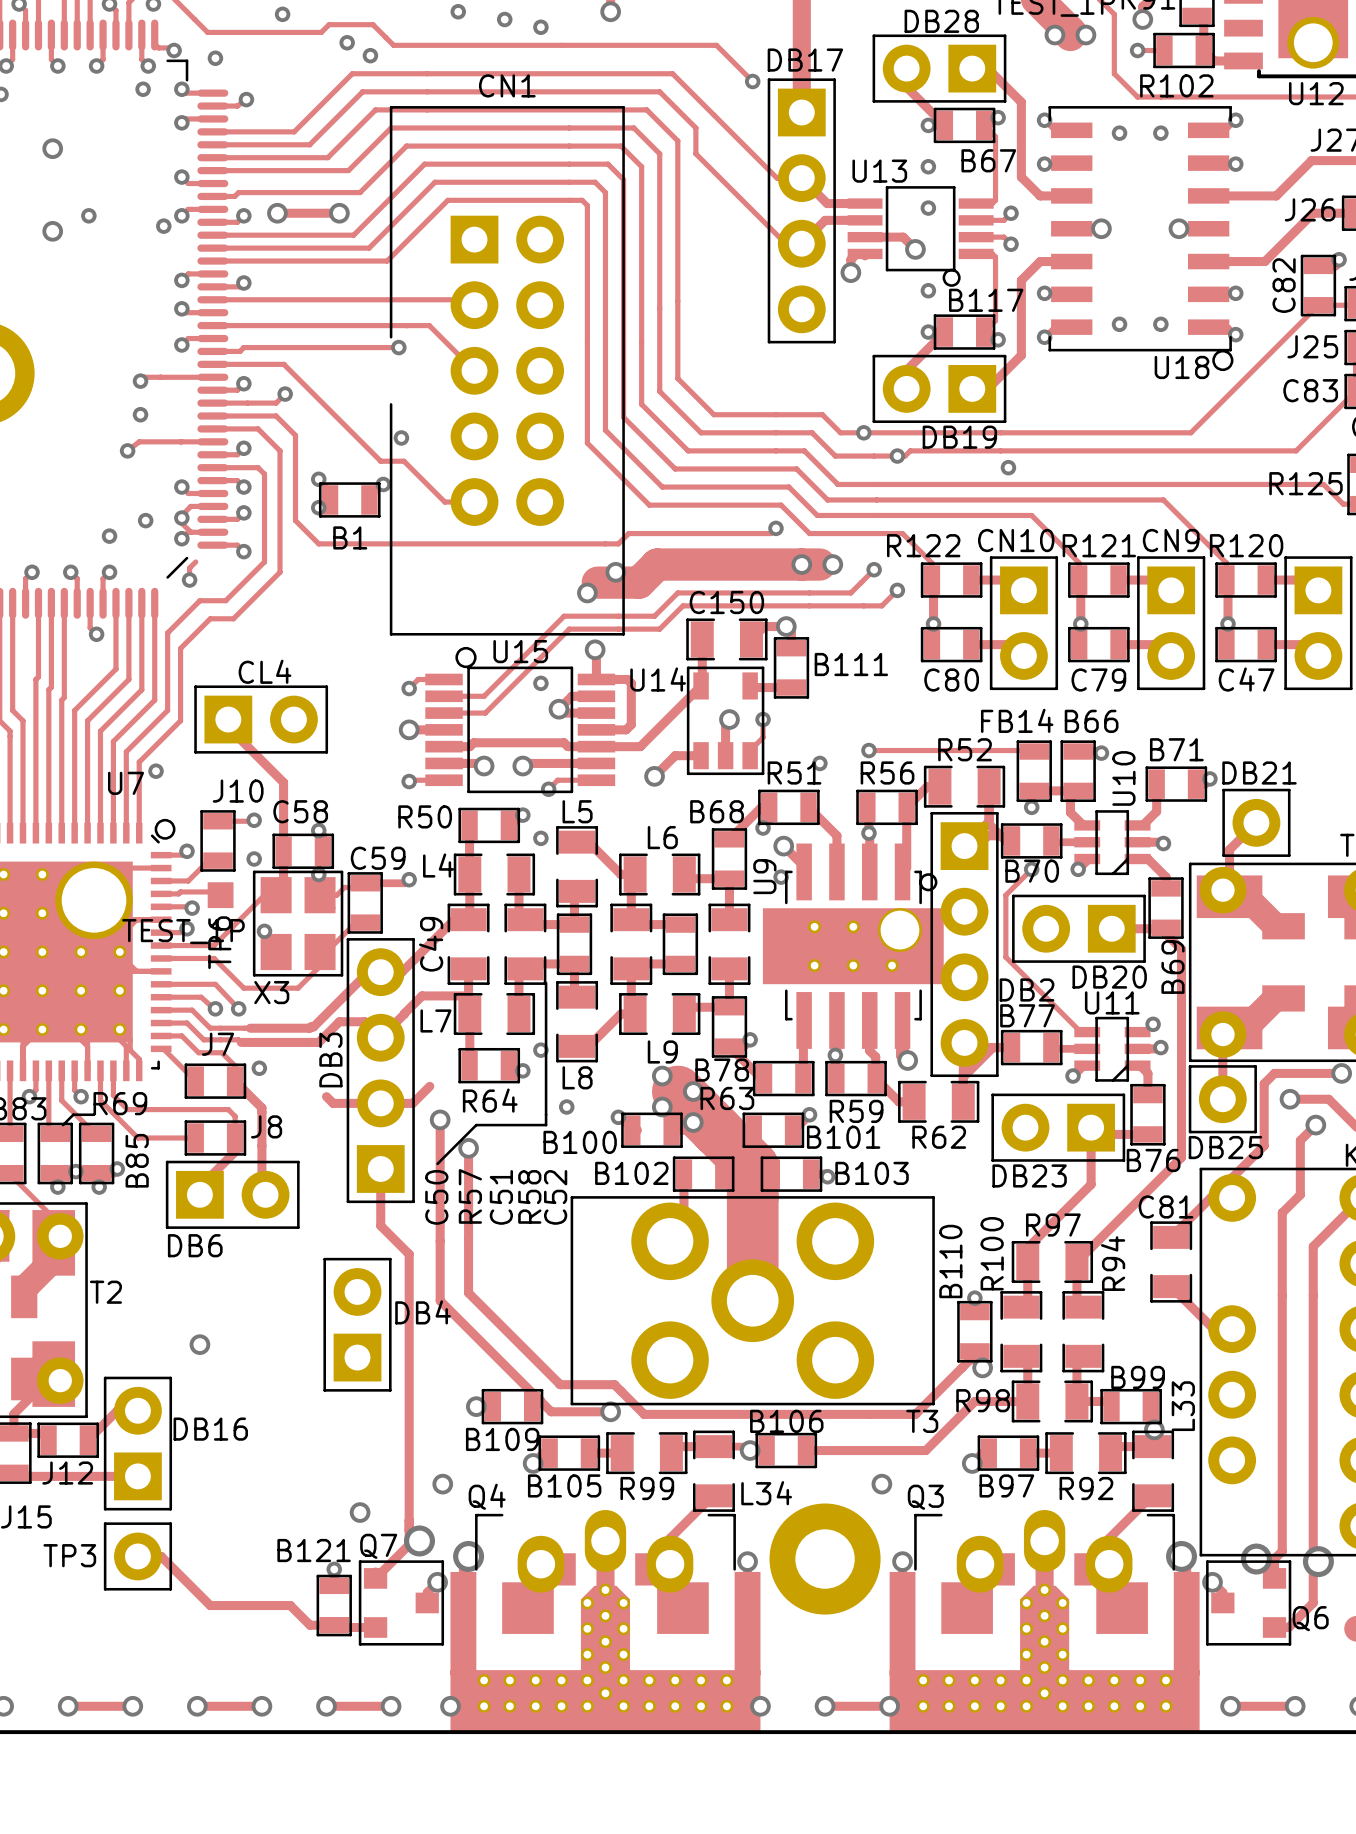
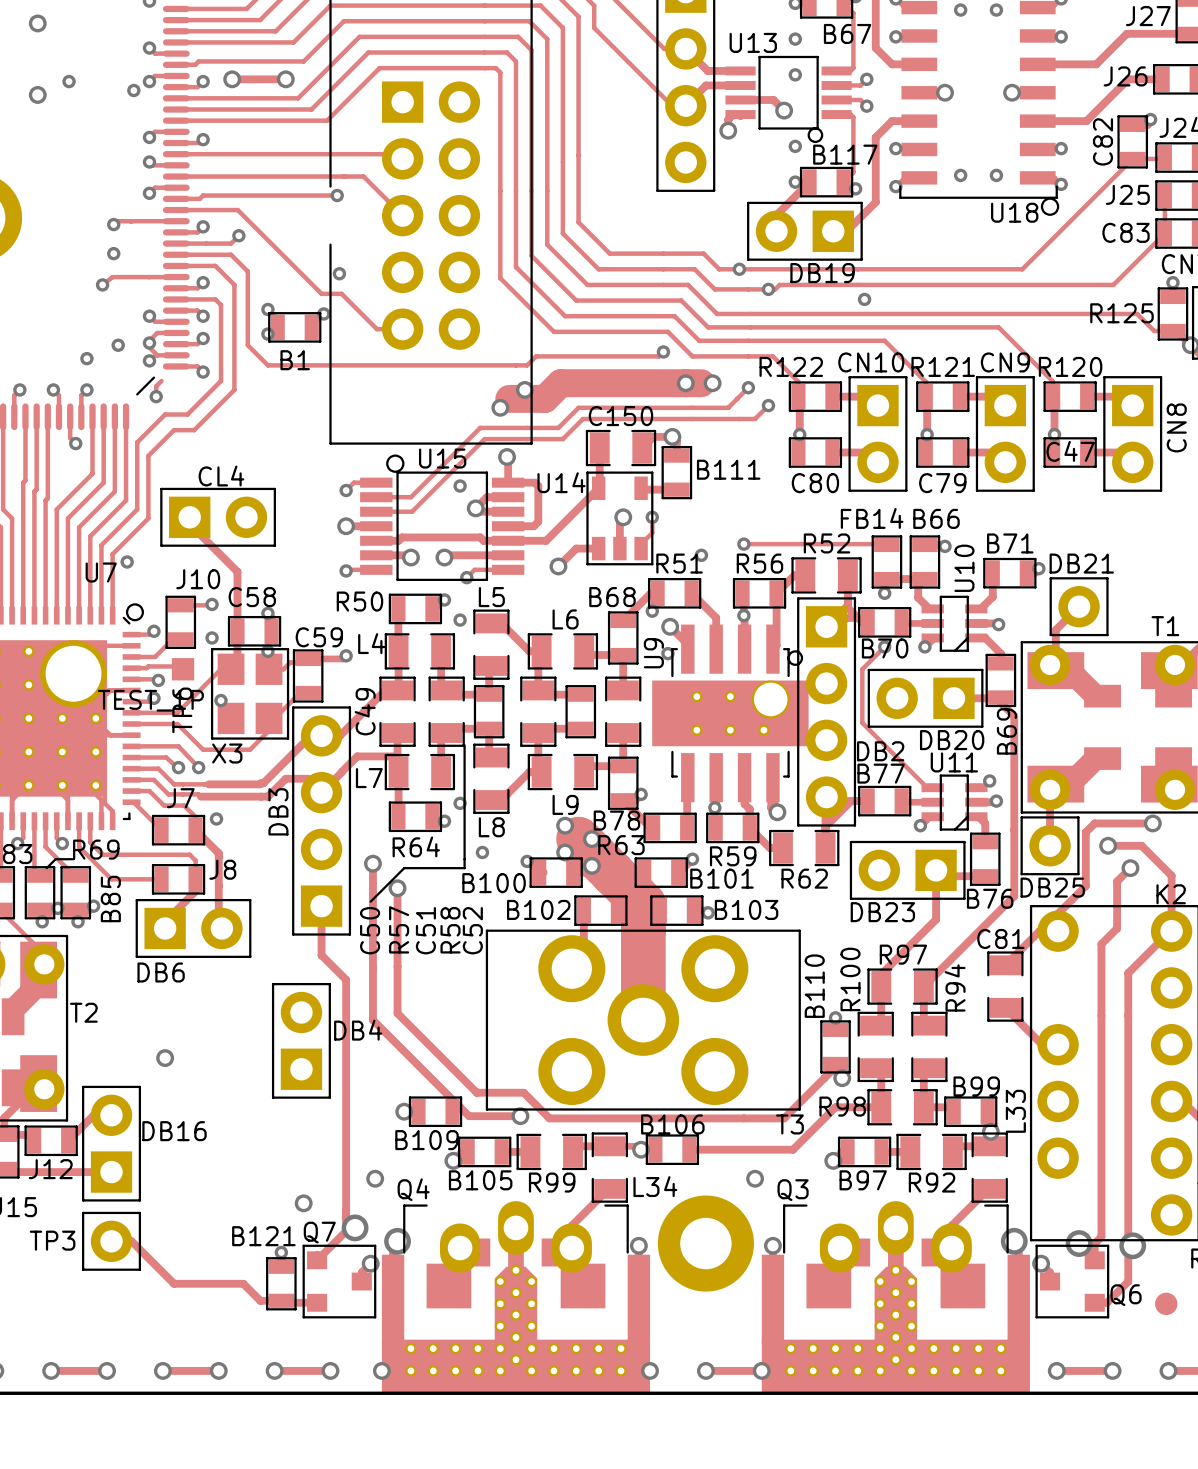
C47 name position: C47 (1246, 679) -> C47 (1070, 451)
track: (429, 1086) (412, 1103) (333, 1103) (326, 1096) -> none

